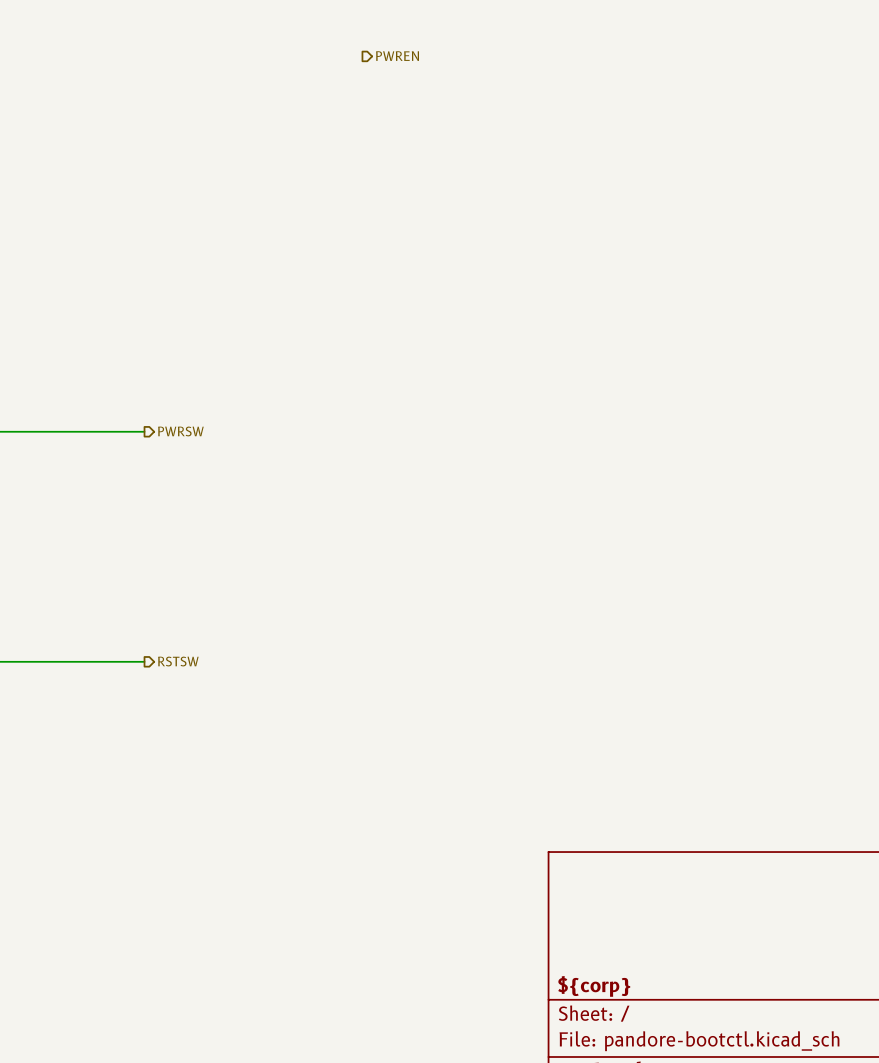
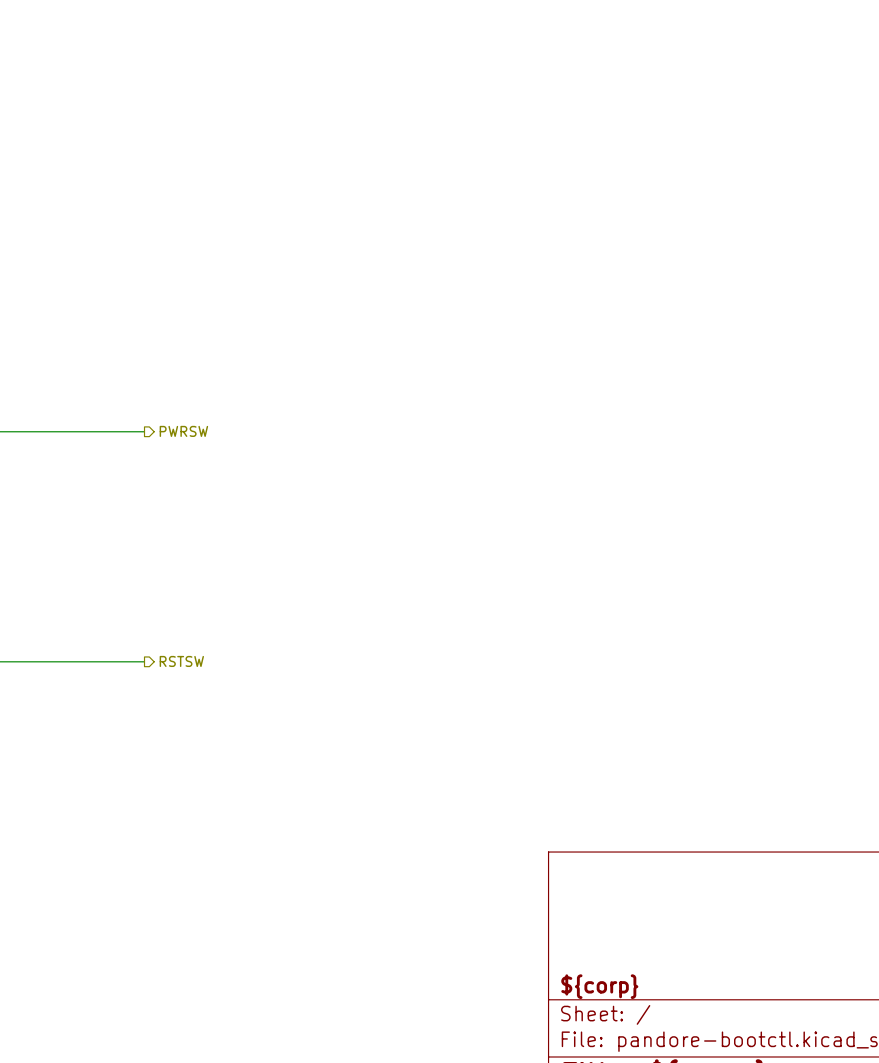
hierarchical label: PWREN (397, 56) -> none

